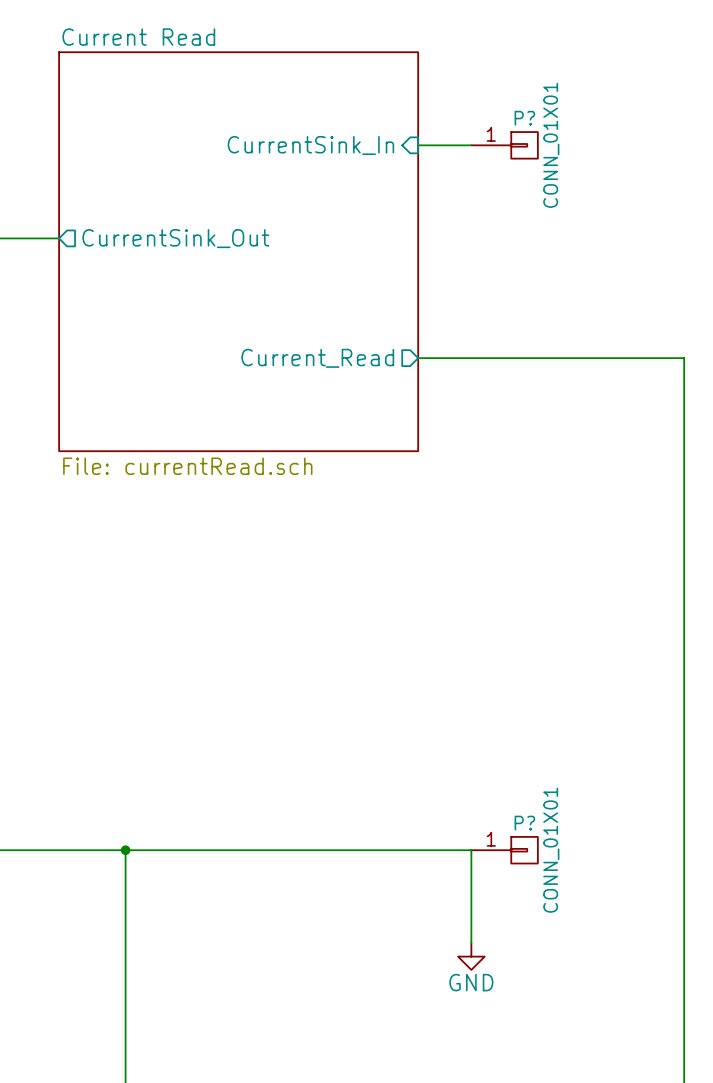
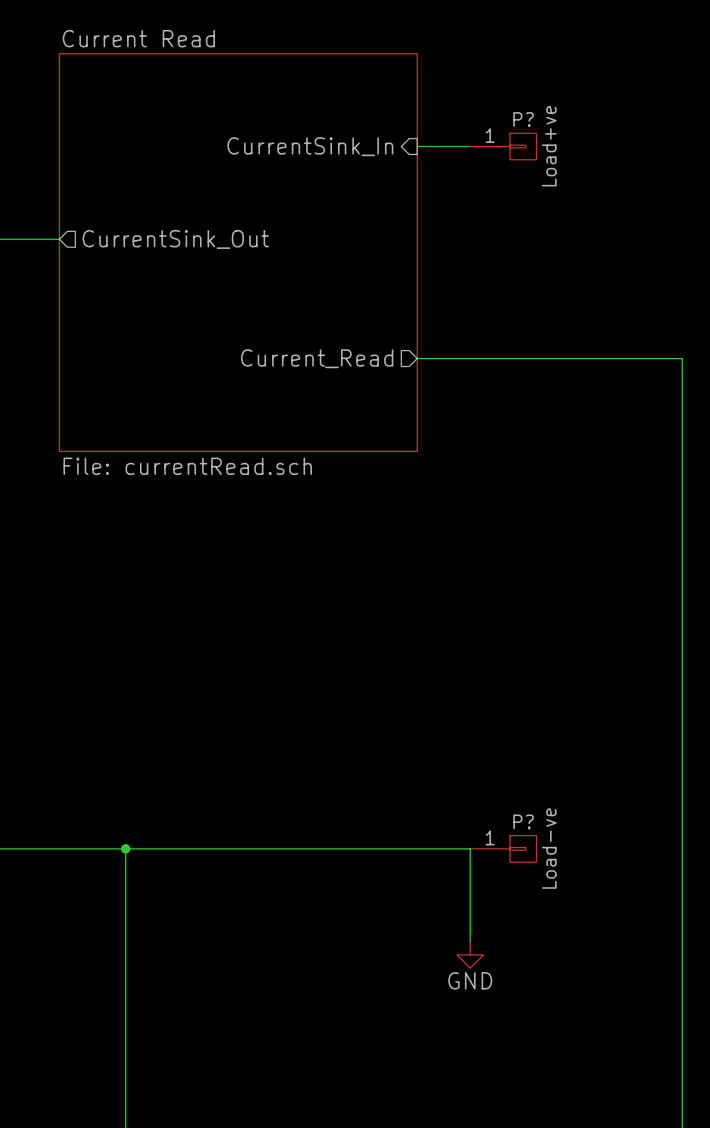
P? value: CONN_01X01 (551, 145) -> Load+ve (549, 146)
P? value: CONN_01X01 (551, 850) -> Load-ve (549, 848)

